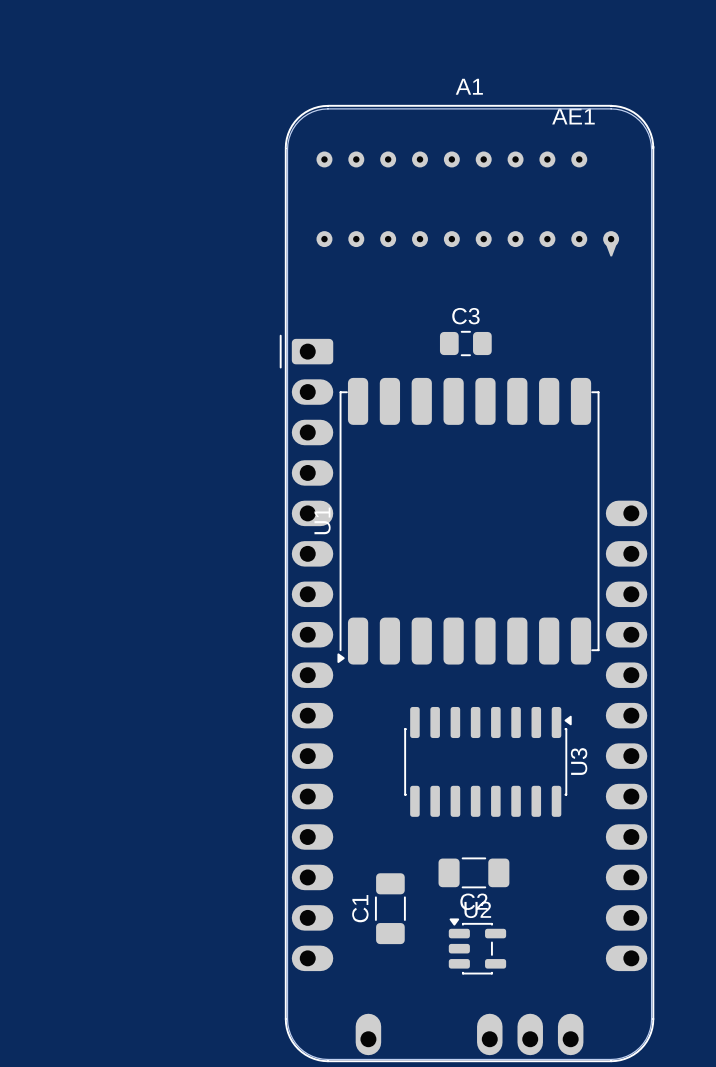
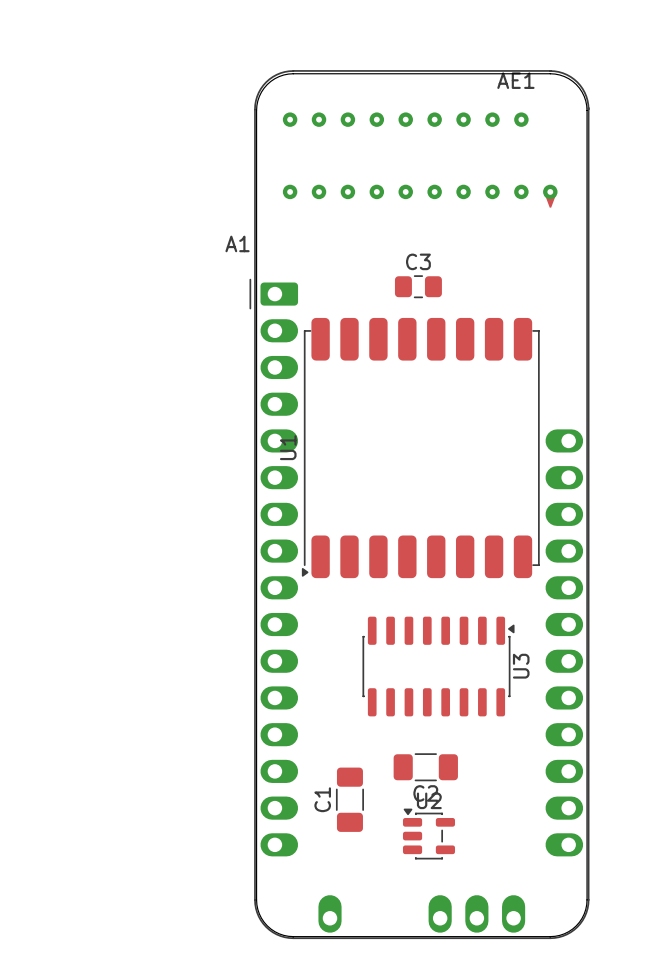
A1 name position: A1 (469, 86) -> A1 (237, 243)

